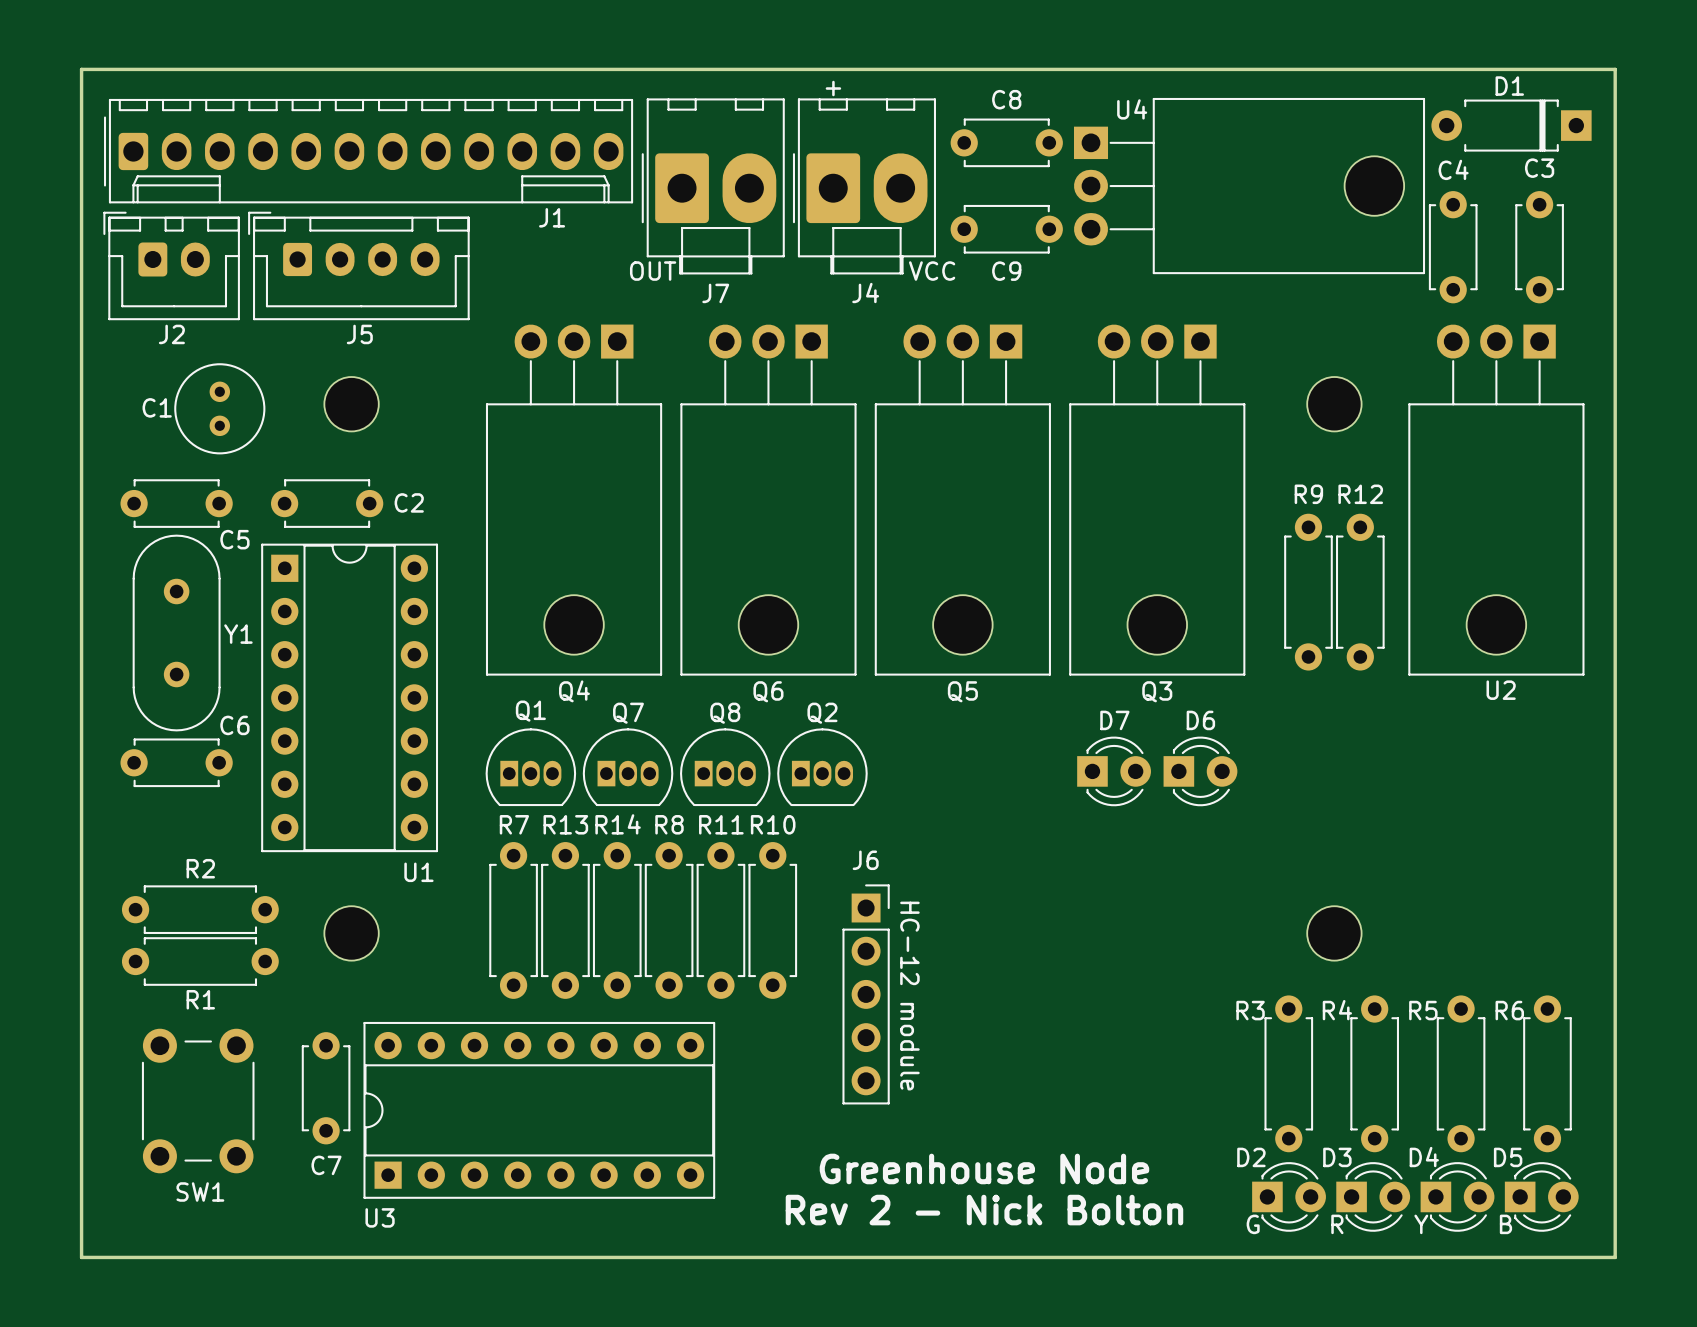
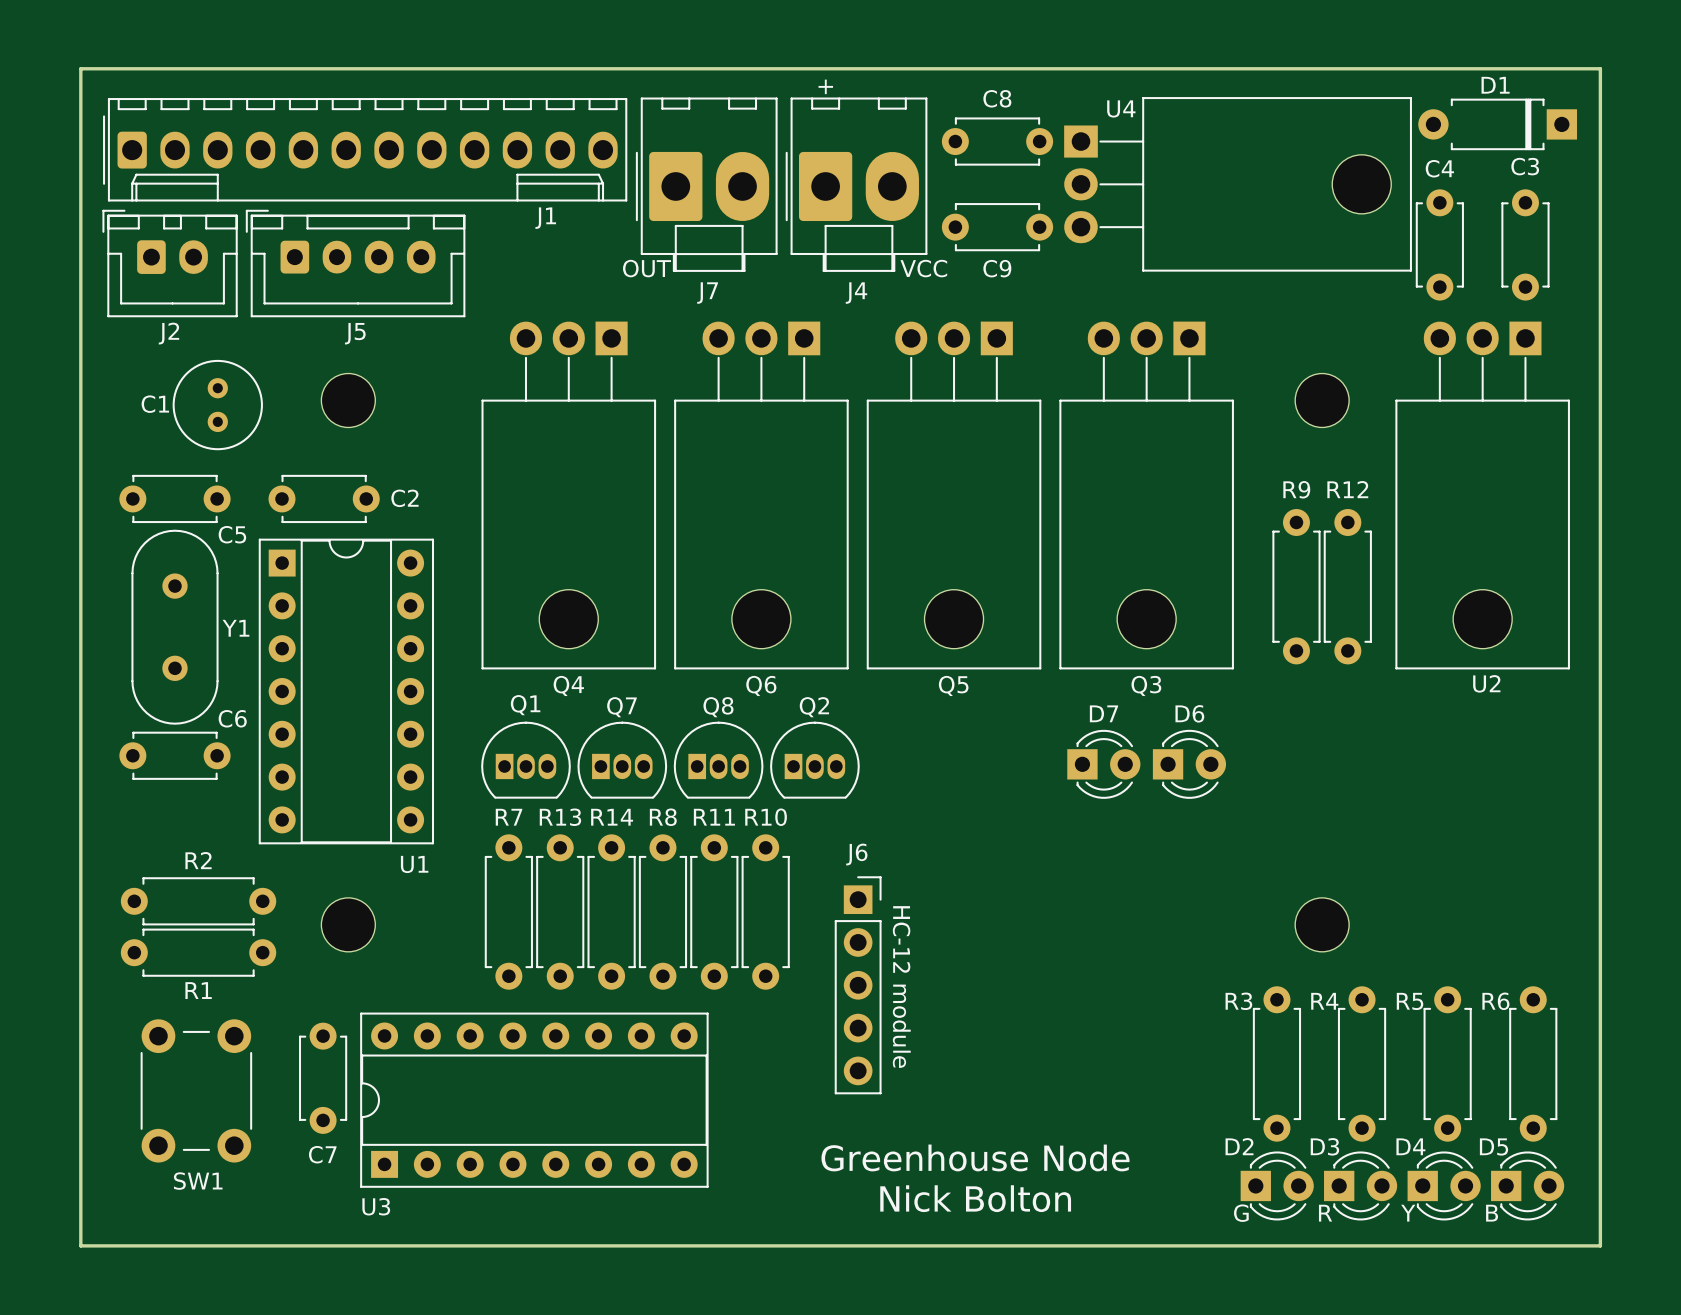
text: Rev 2 - Nick Bolton (984, 1210) -> Nick Bolton (975, 1198)

